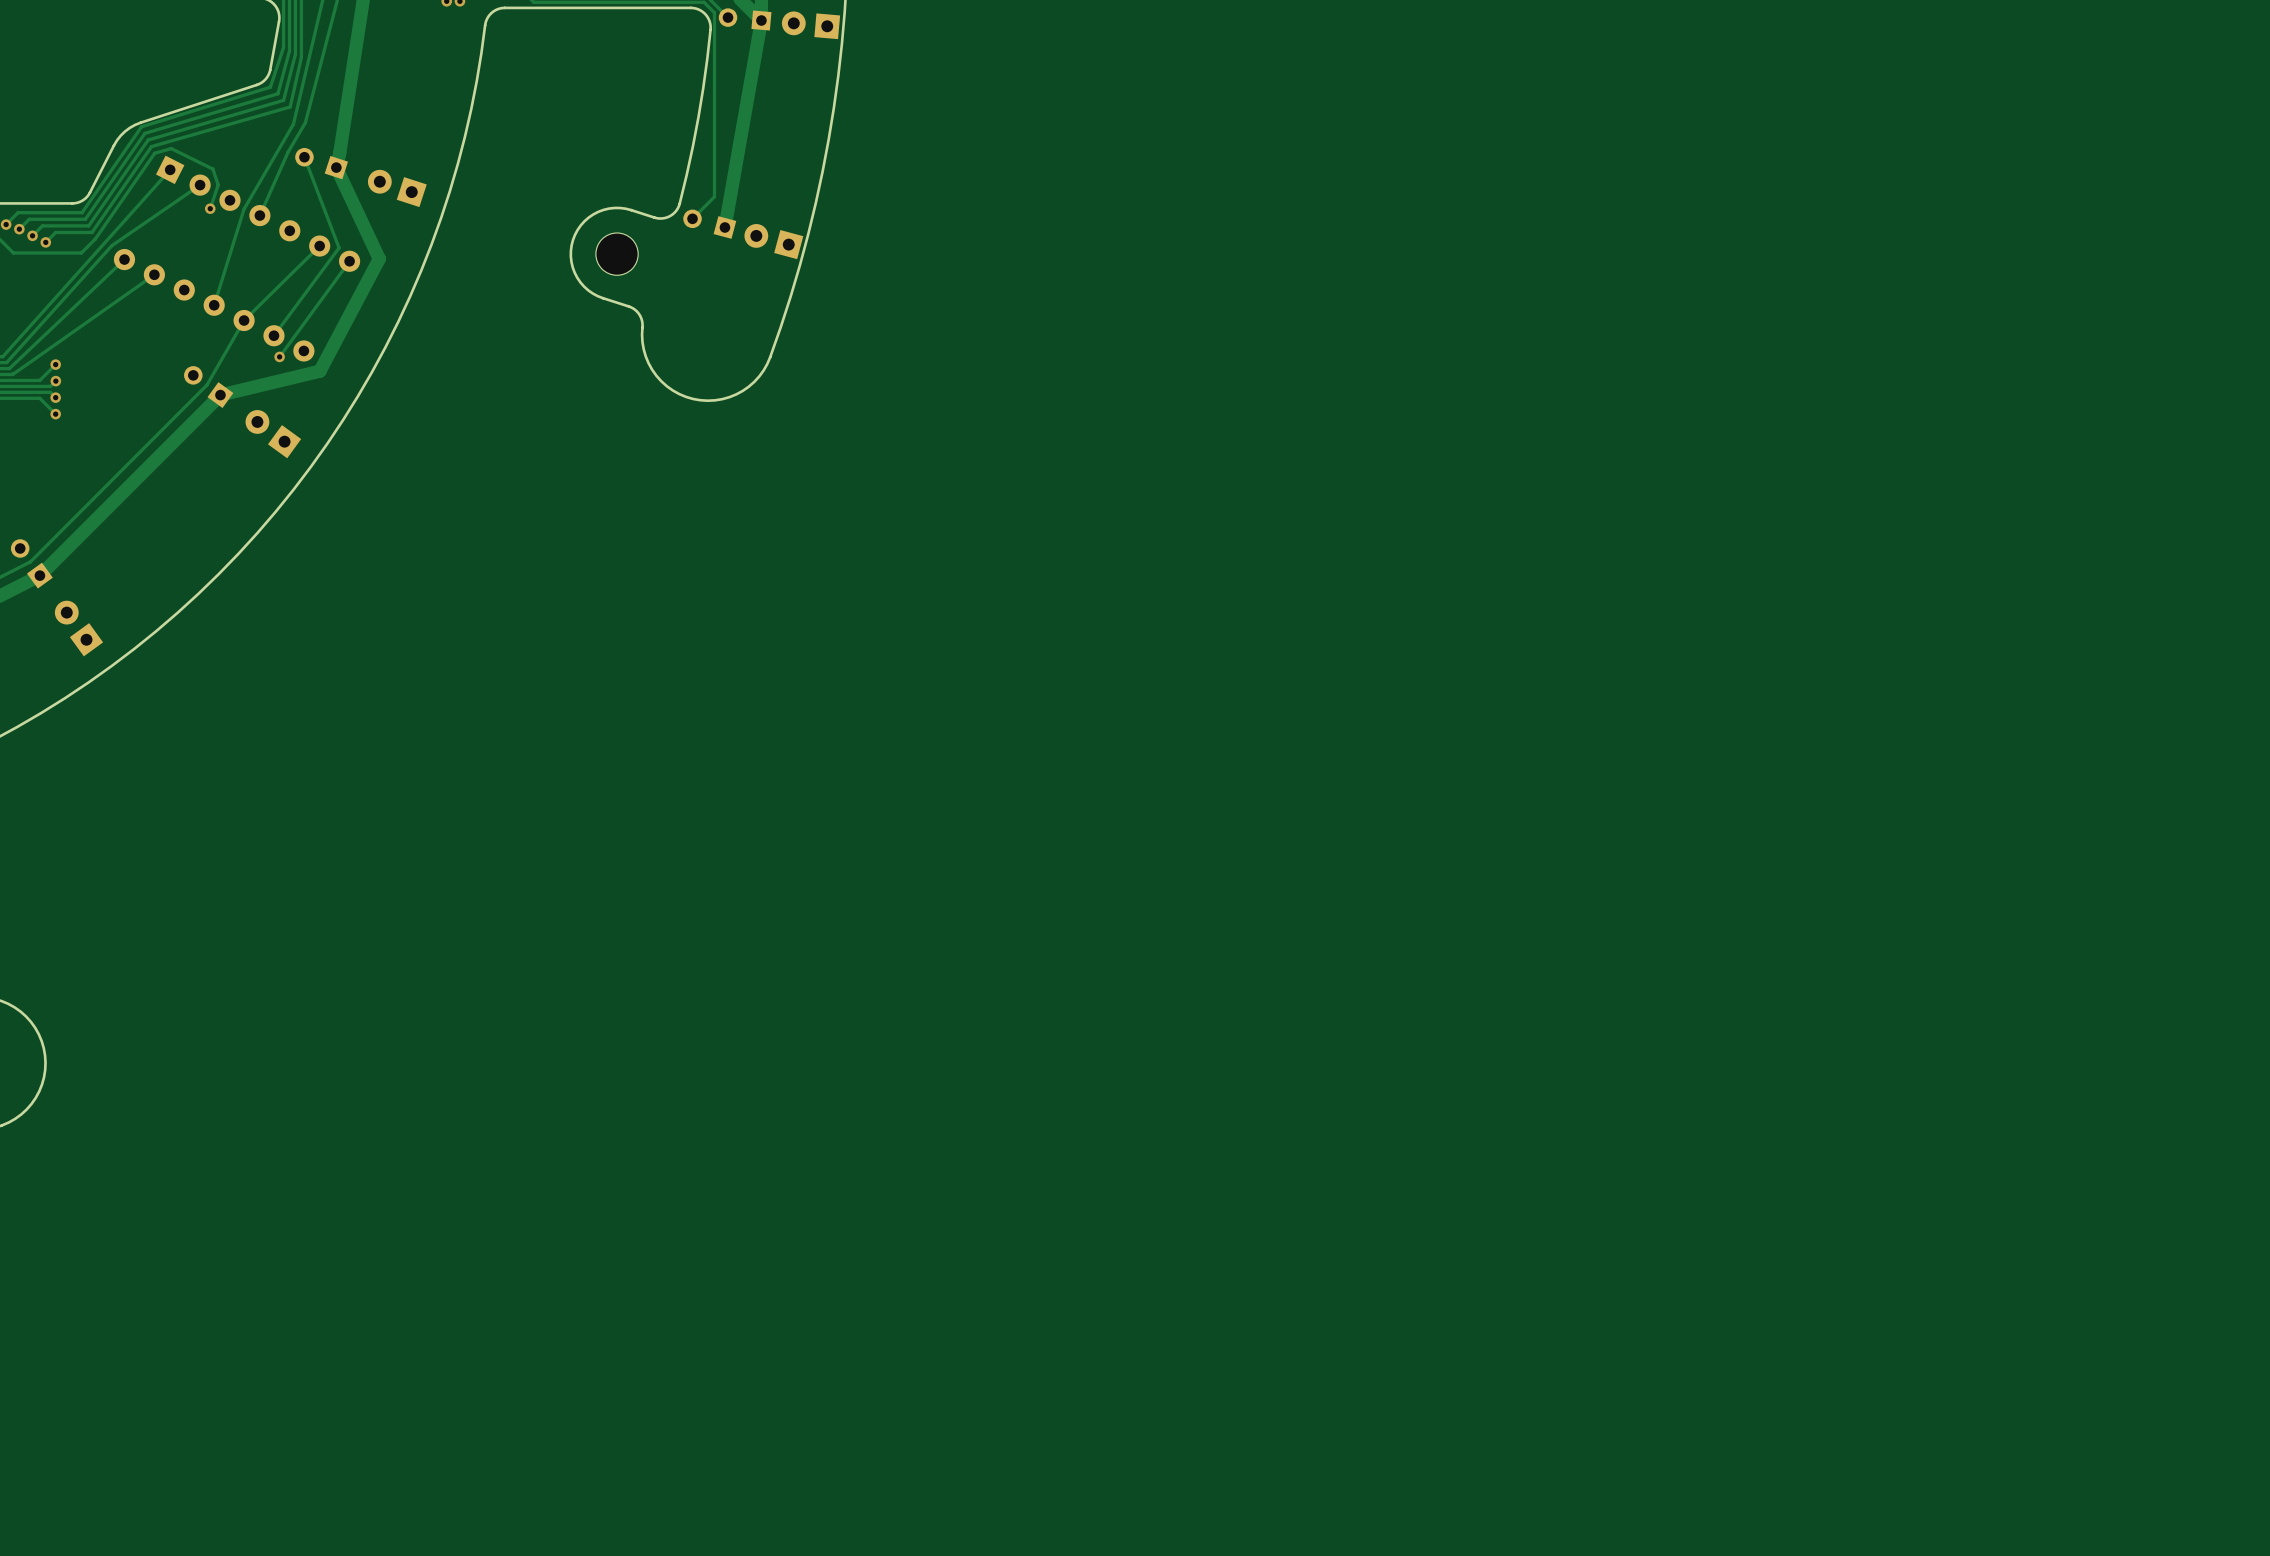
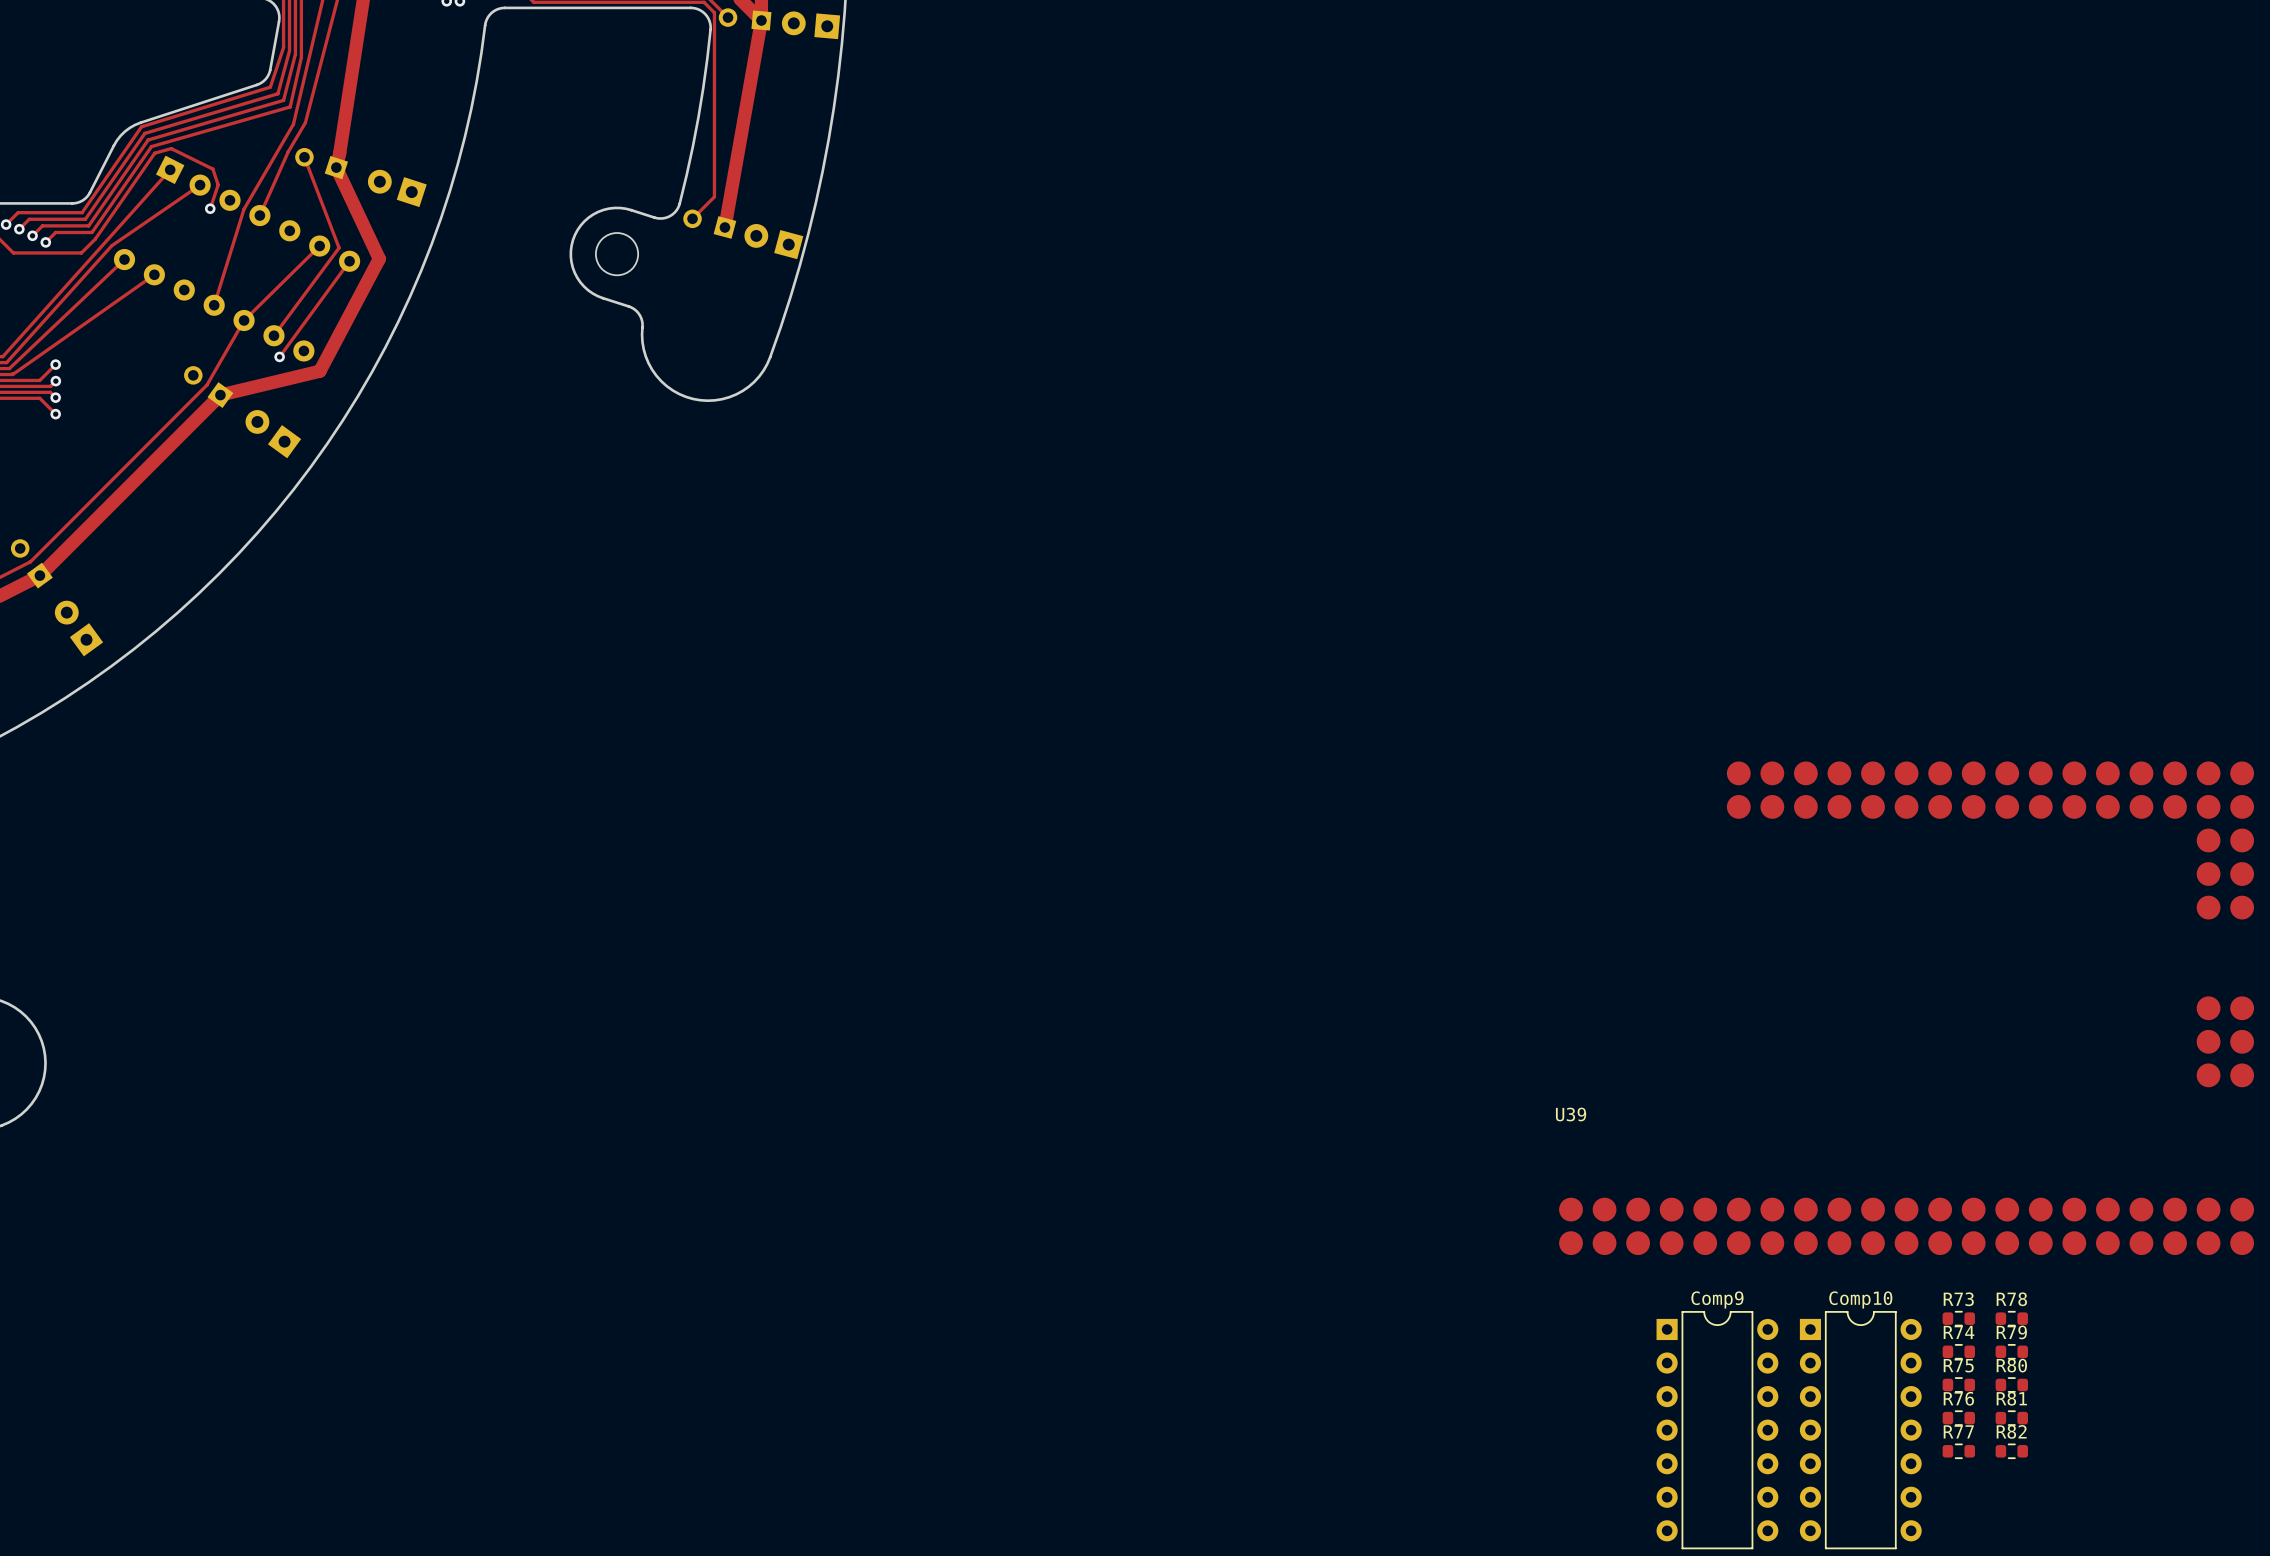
U39: none -> (1906, 1008)
R73: none -> (1958, 1318)
R78: none -> (2011, 1318)
R74: none -> (1958, 1351)
R79: none -> (2011, 1351)
R75: none -> (1958, 1384)
R80: none -> (2011, 1384)
R76: none -> (1958, 1418)
R81: none -> (2011, 1418)
Comp9: none -> (1717, 1430)
Comp10: none -> (1860, 1430)
R77: none -> (1958, 1451)
R82: none -> (2011, 1451)

